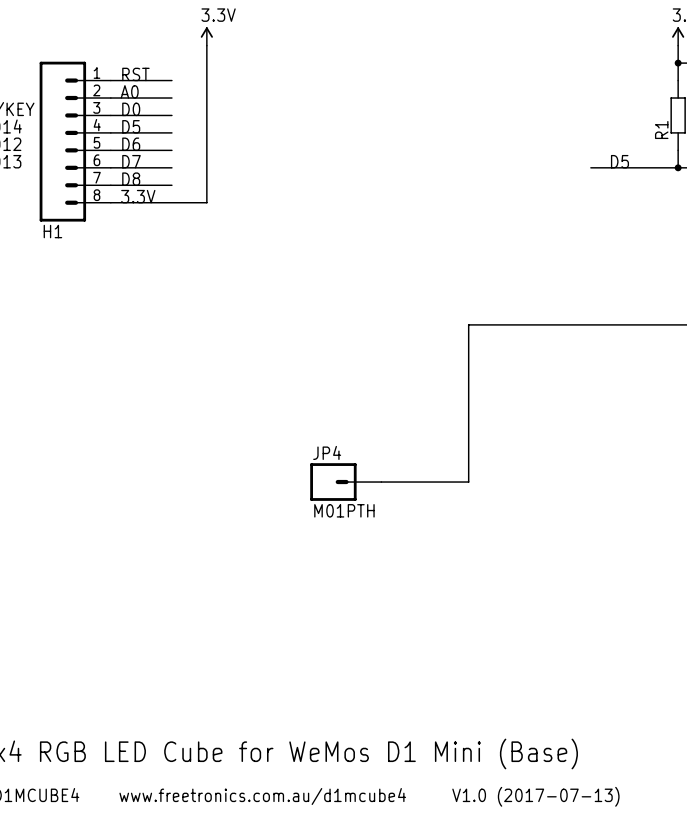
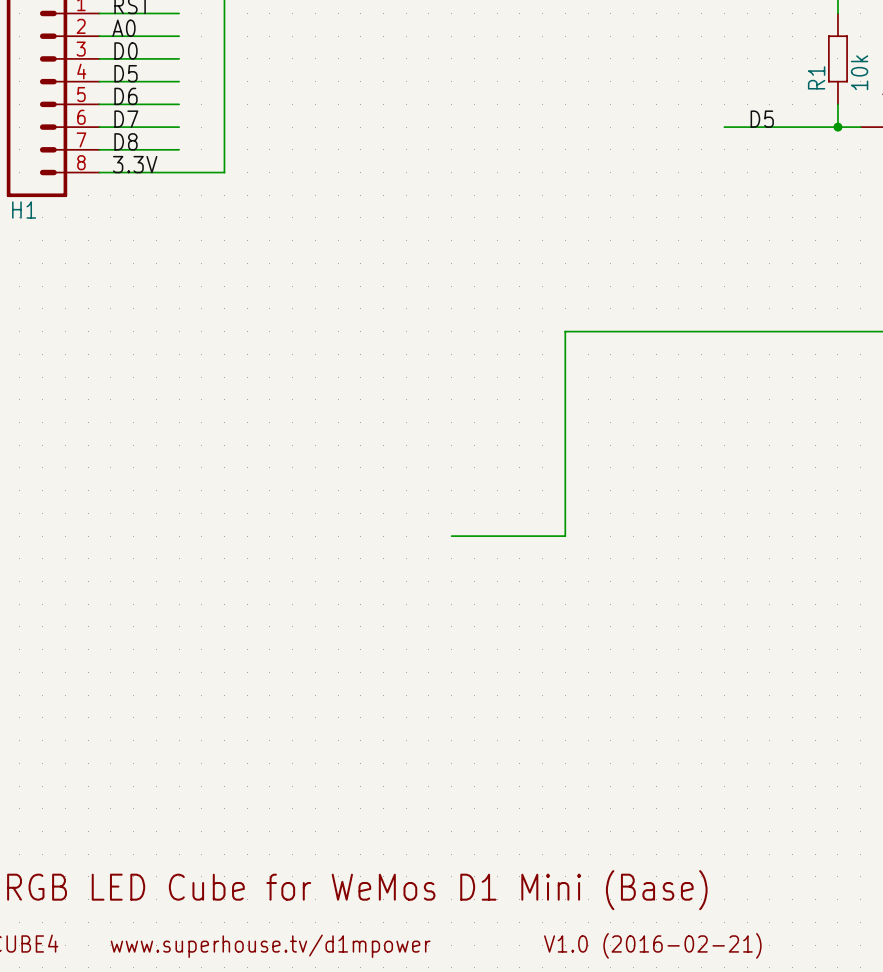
JP4: M01PTH (345, 482) -> none
text: www.freetronics.com.au/d1mcube4 (262, 796) -> www.superhouse.tv/d1mpower (270, 946)
text: V1.0 (2017-07-13) (535, 796) -> V1.0 (2016-02-21) (652, 945)

